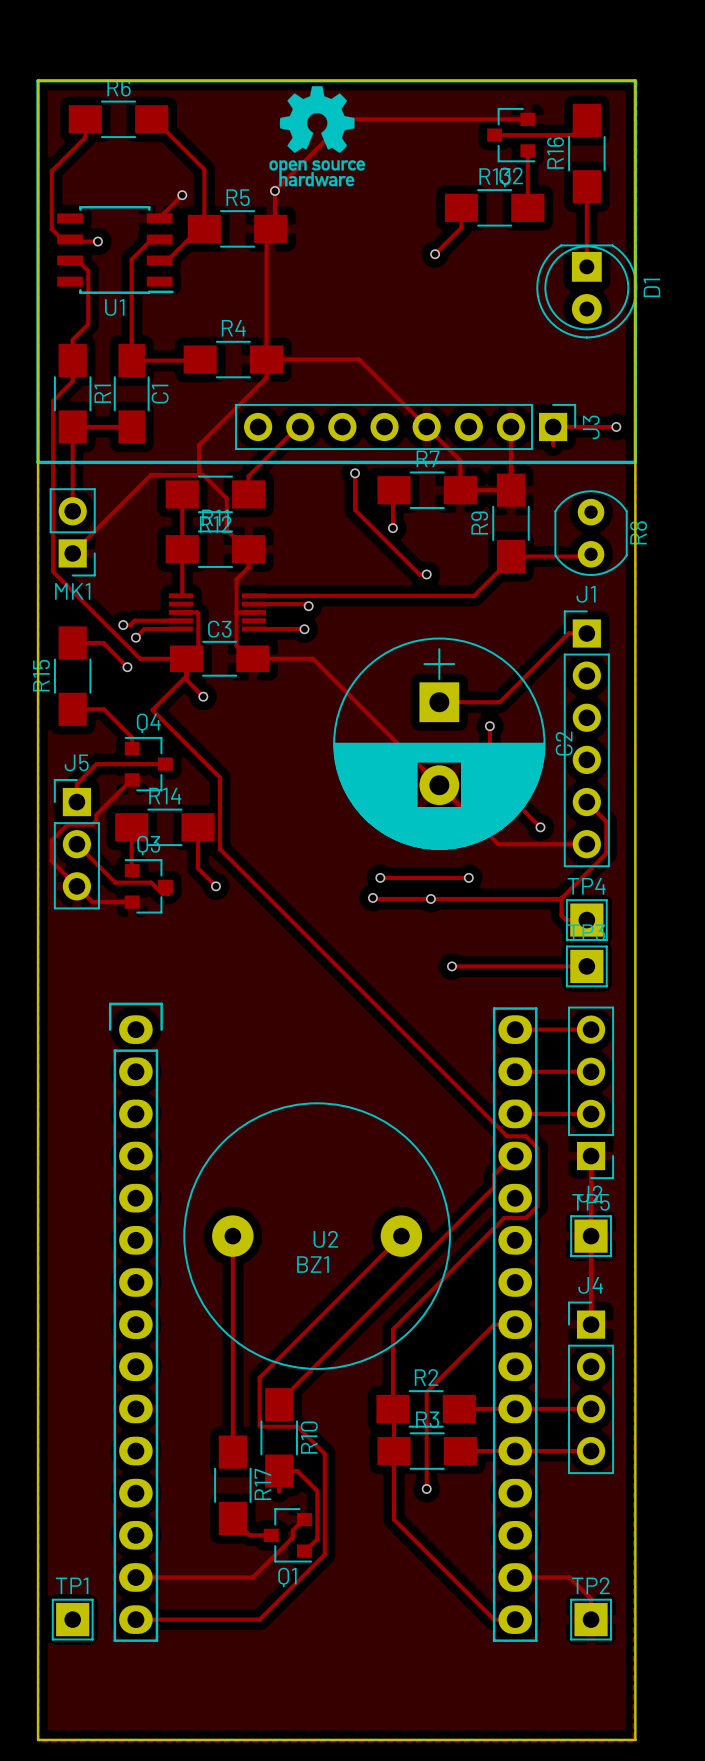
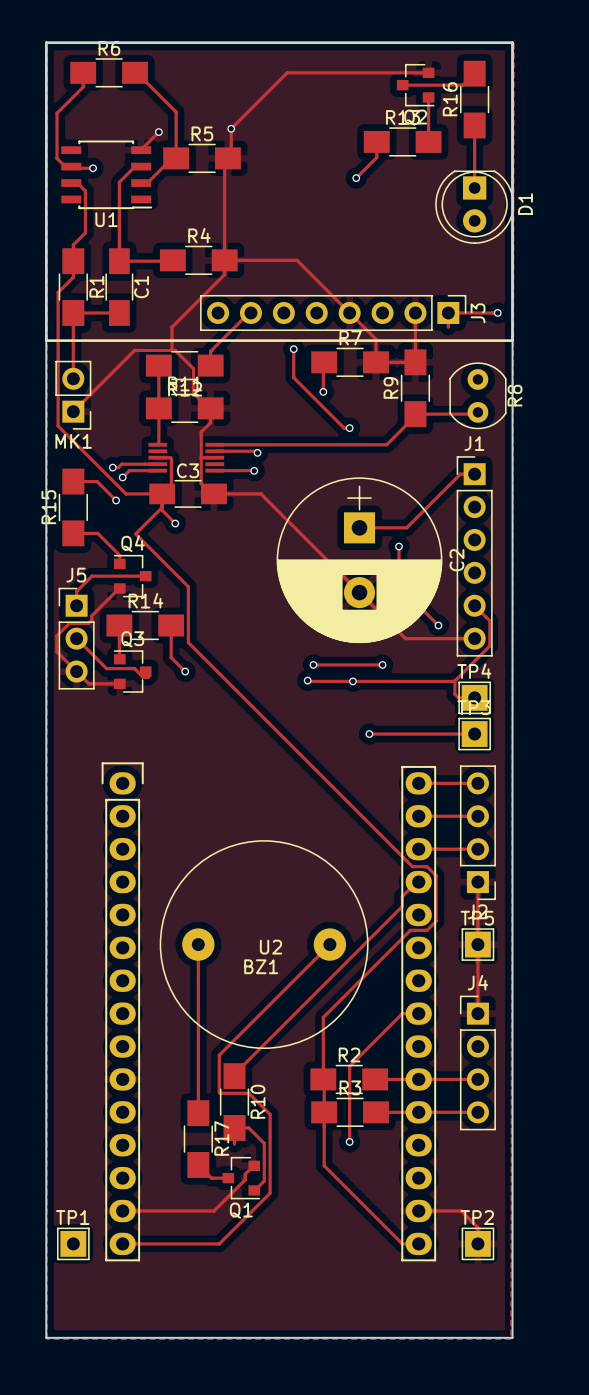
drawing: [269, 86, 365, 187] -> none

